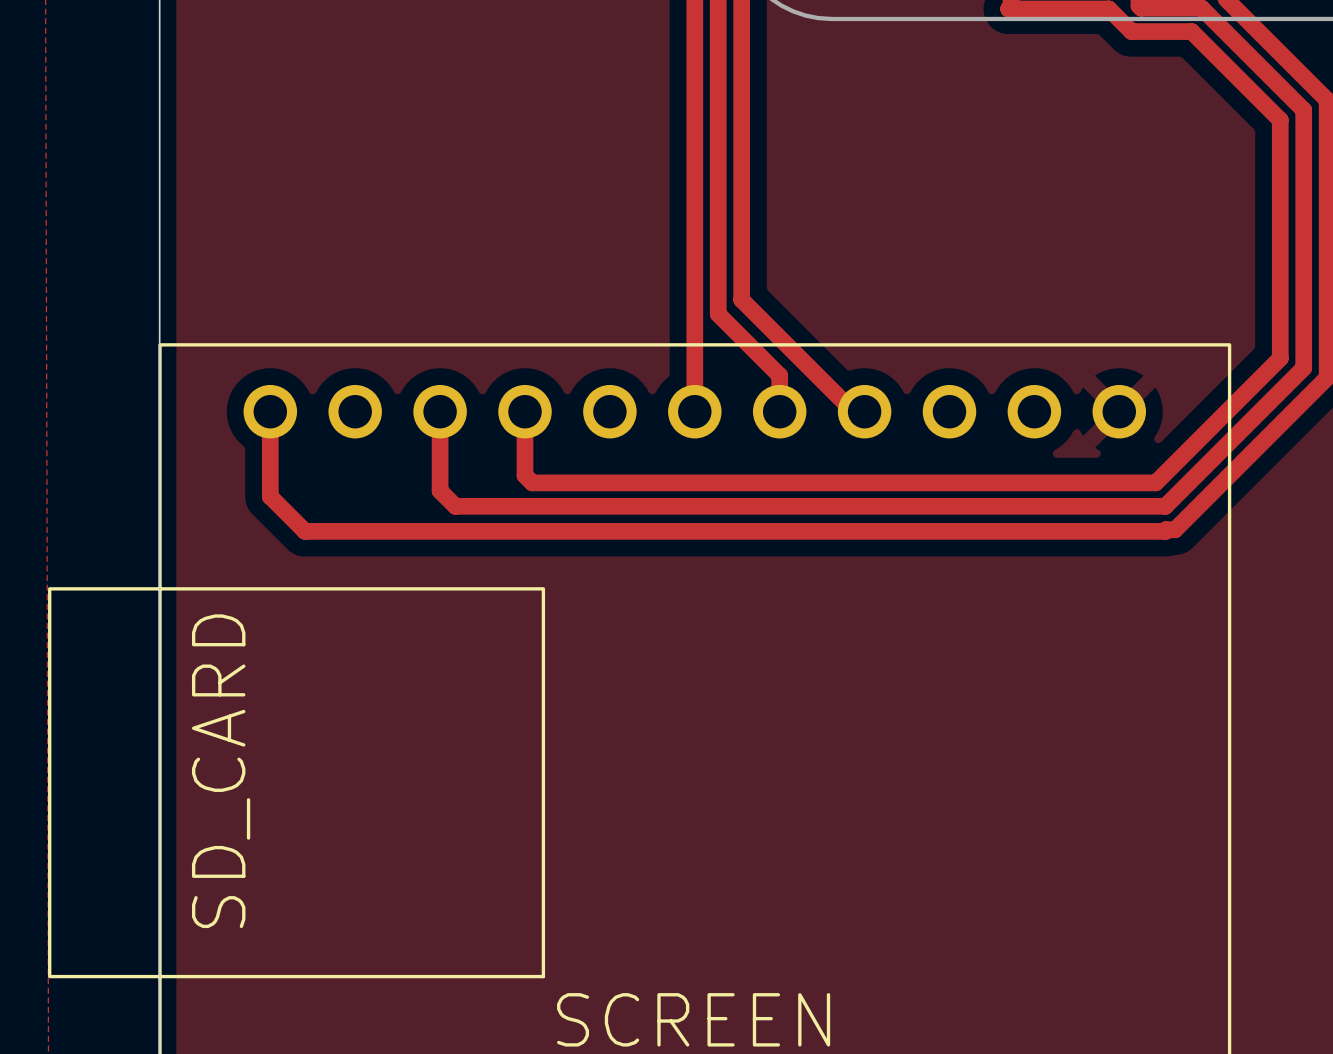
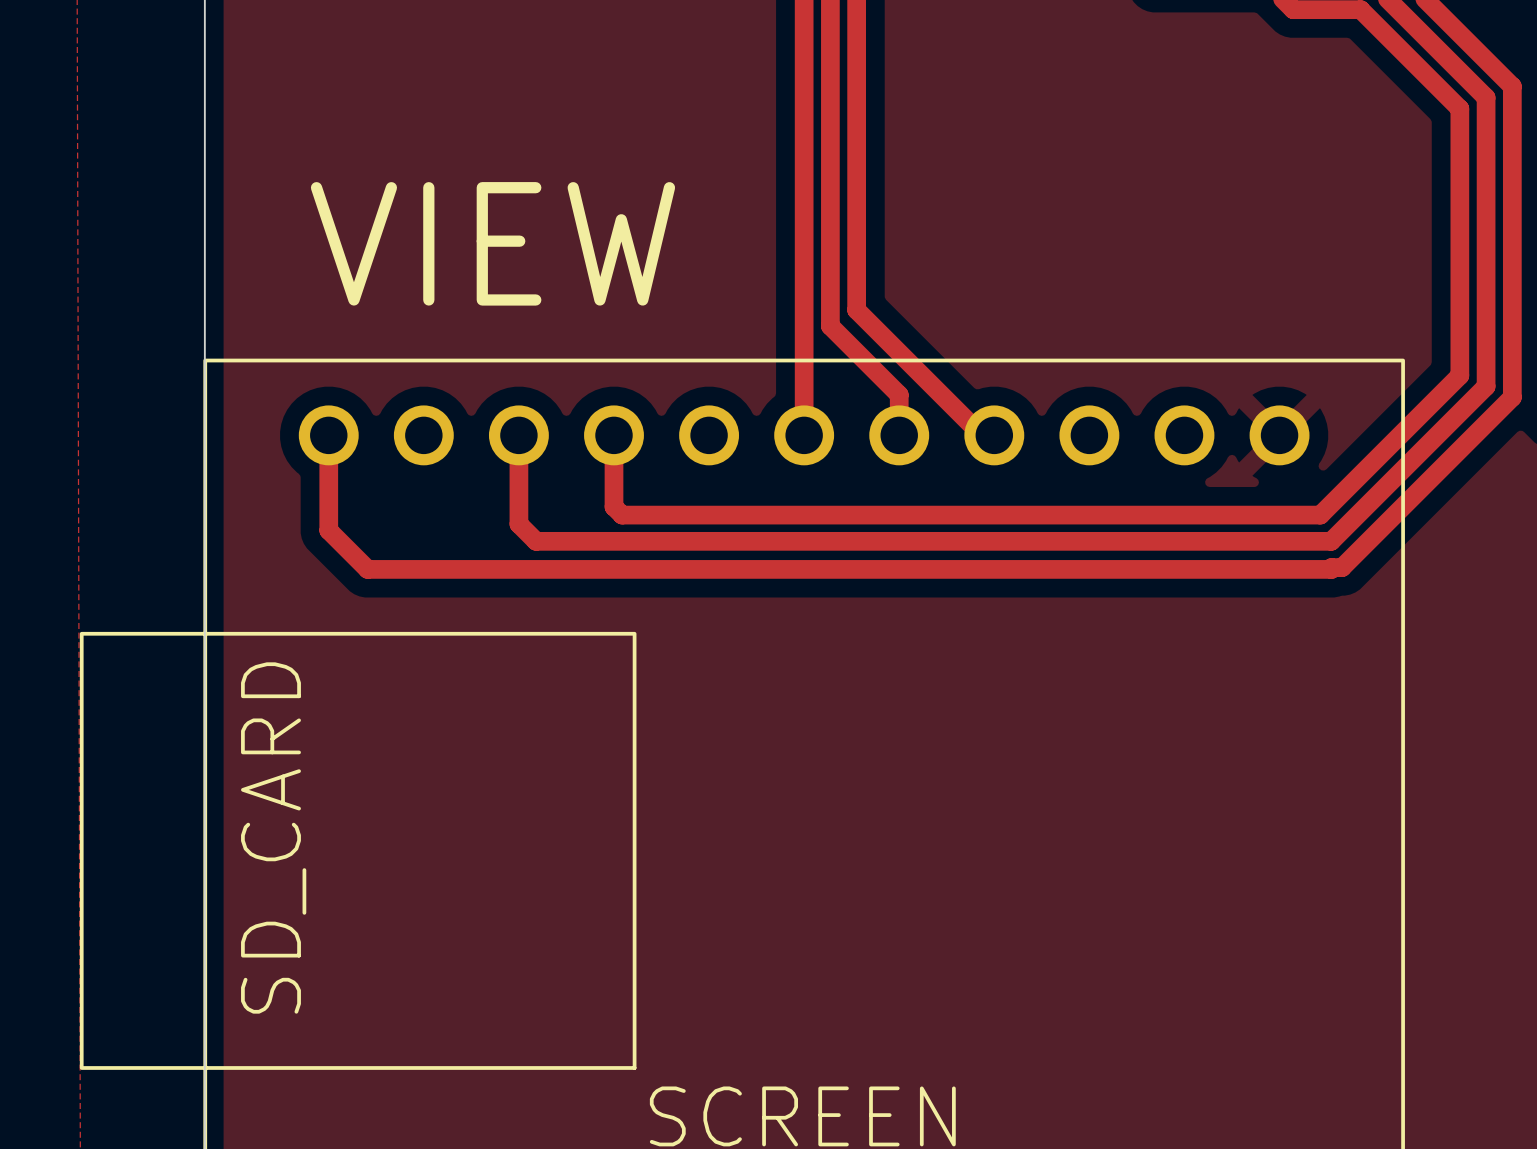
text: none -> VIEW (492, 243)

